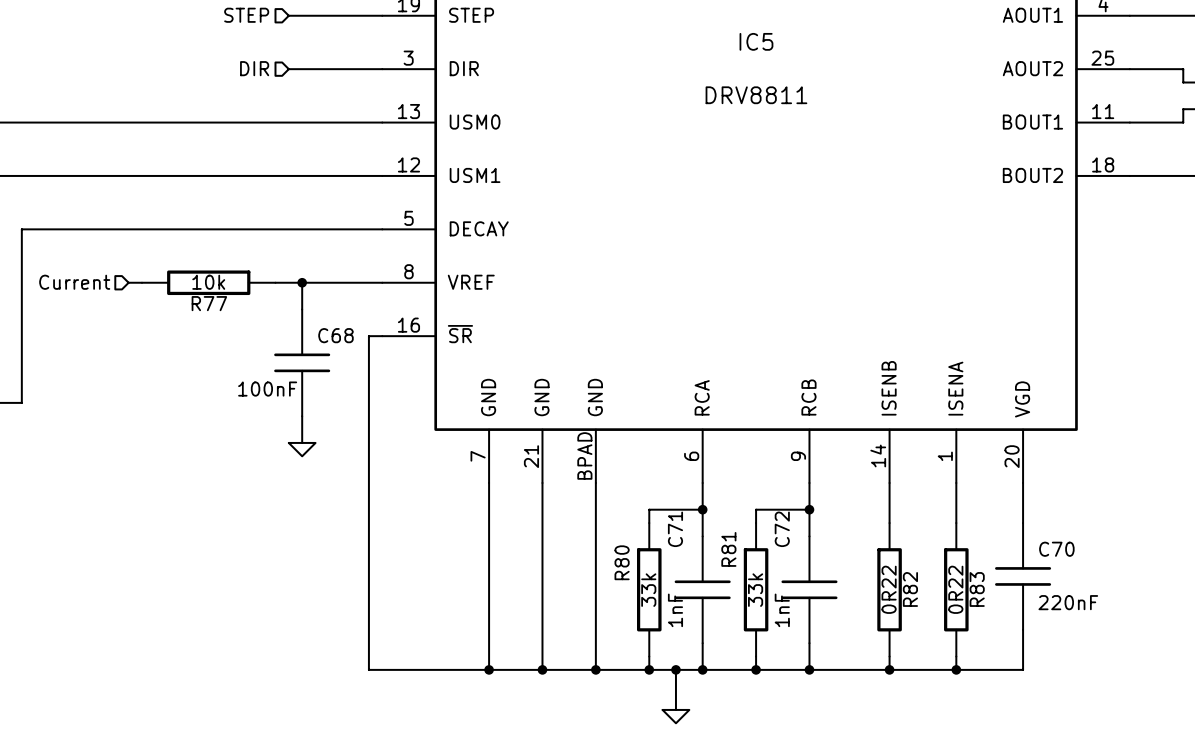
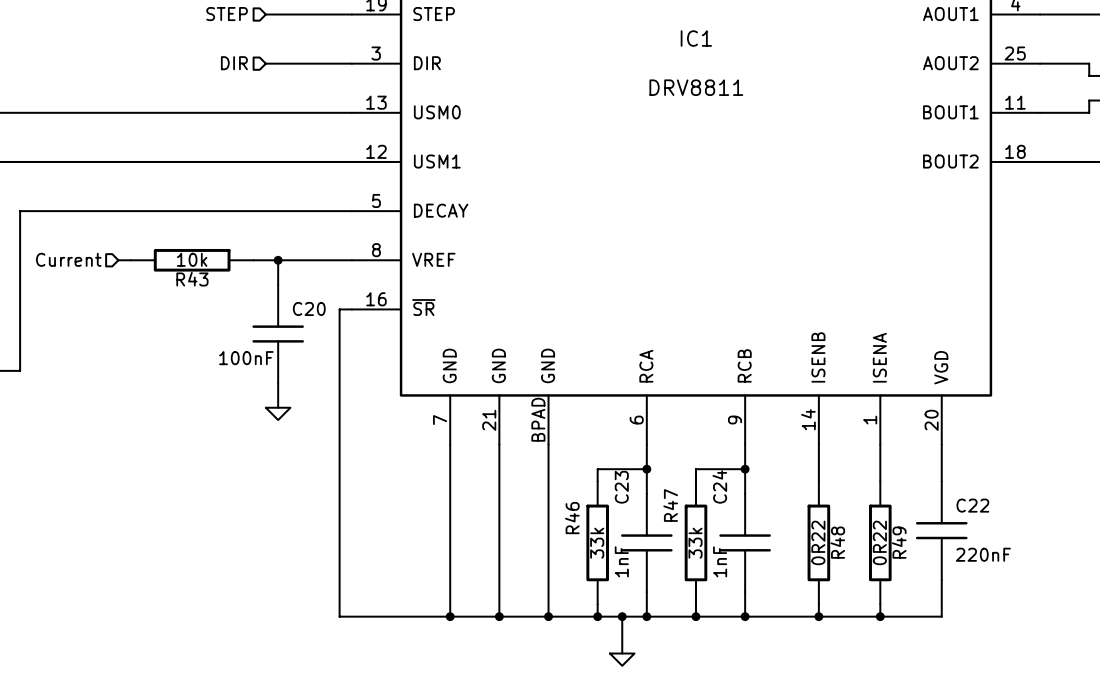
IC5 name: IC5 (756, 41) -> IC1 (696, 38)
R77 name: R77 (209, 303) -> R43 (192, 279)
C68 name: C68 (335, 335) -> C20 (309, 308)
C71 name: C71 (675, 529) -> C23 (621, 487)
C72 name: C72 (782, 529) -> C24 (719, 486)
R81 name: R81 (728, 549) -> R47 (670, 505)
C70 name: C70 (1056, 549) -> C22 (972, 505)
R80 name: R80 (622, 562) -> R46 (572, 518)
R82 name: R82 (910, 589) -> R48 (837, 542)
R83 name: R83 (977, 589) -> R49 (899, 542)

